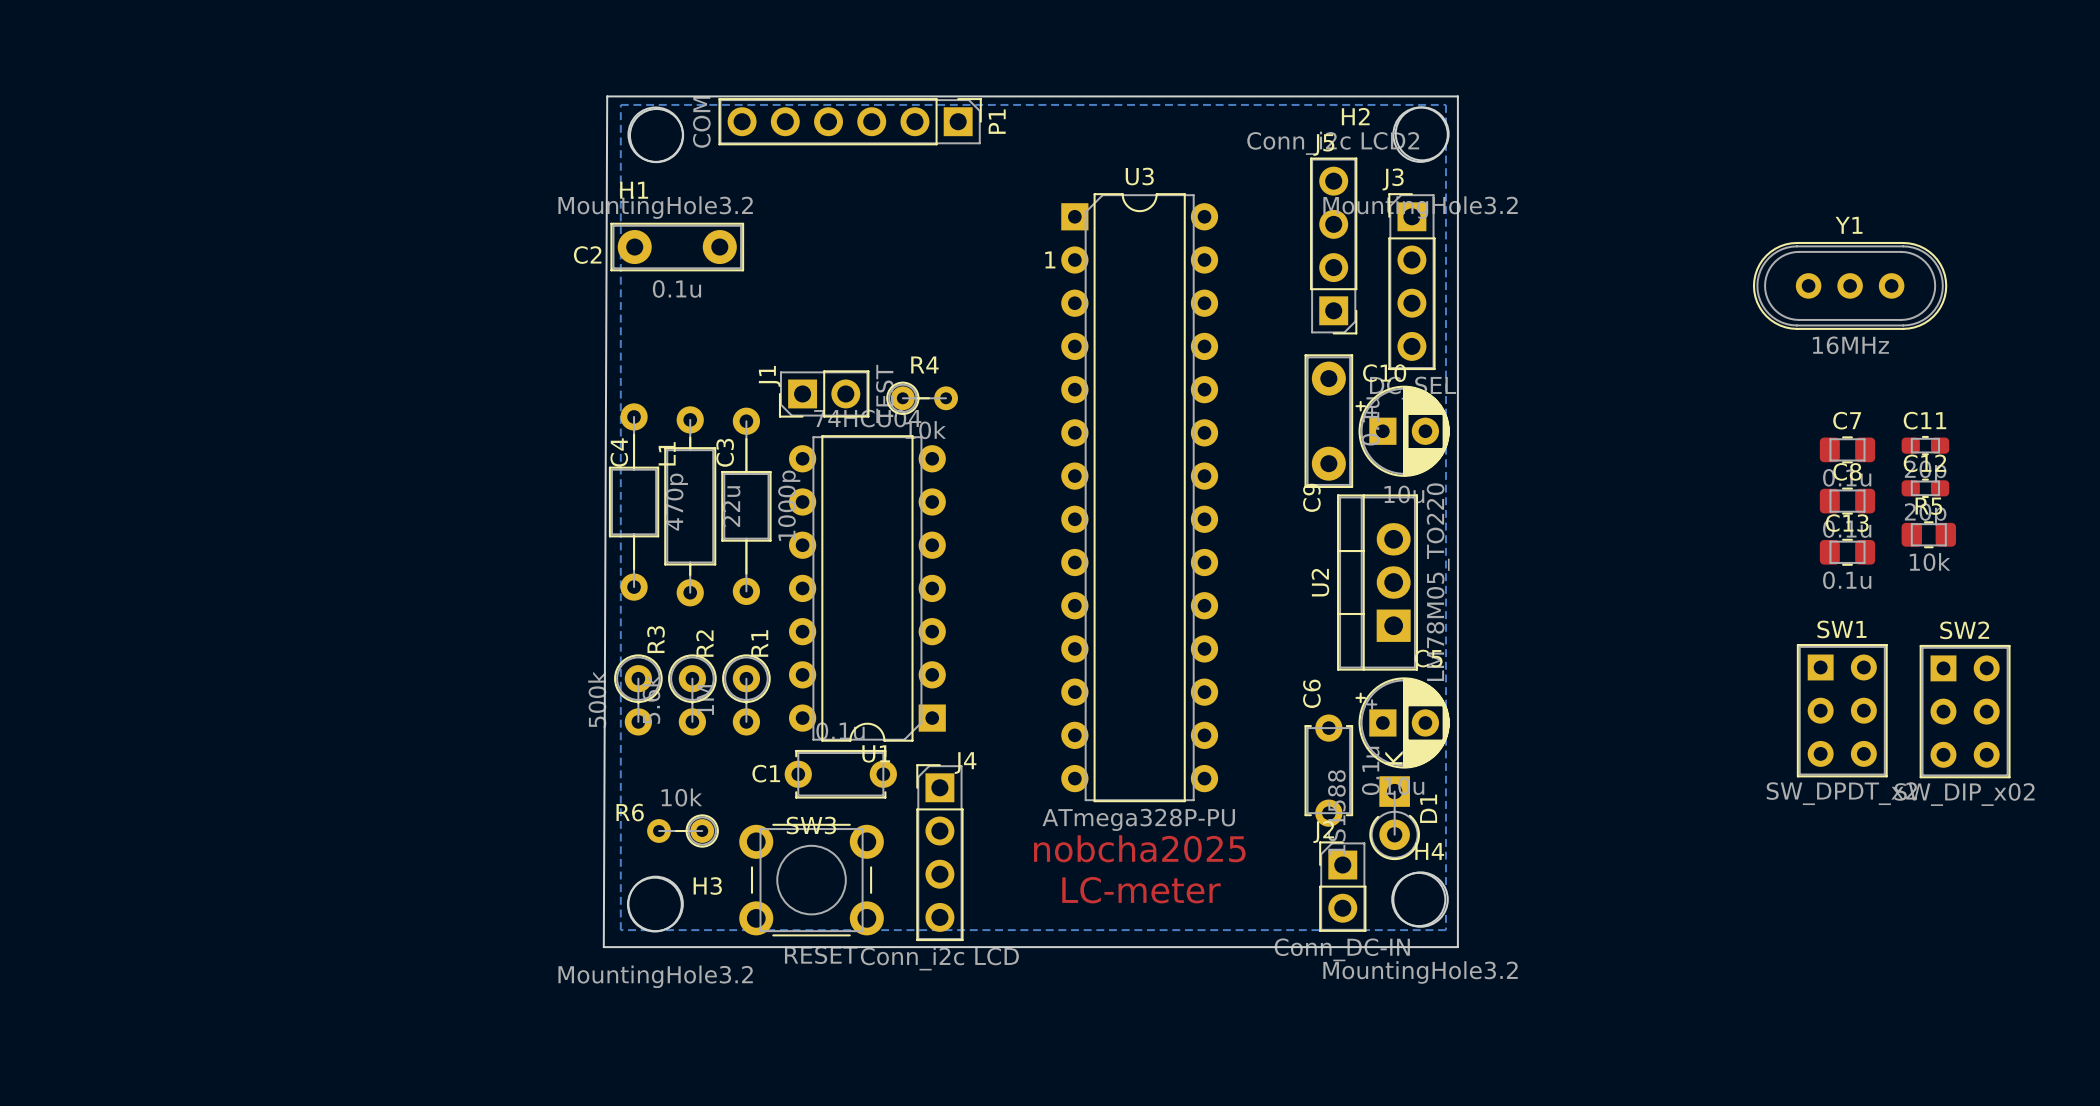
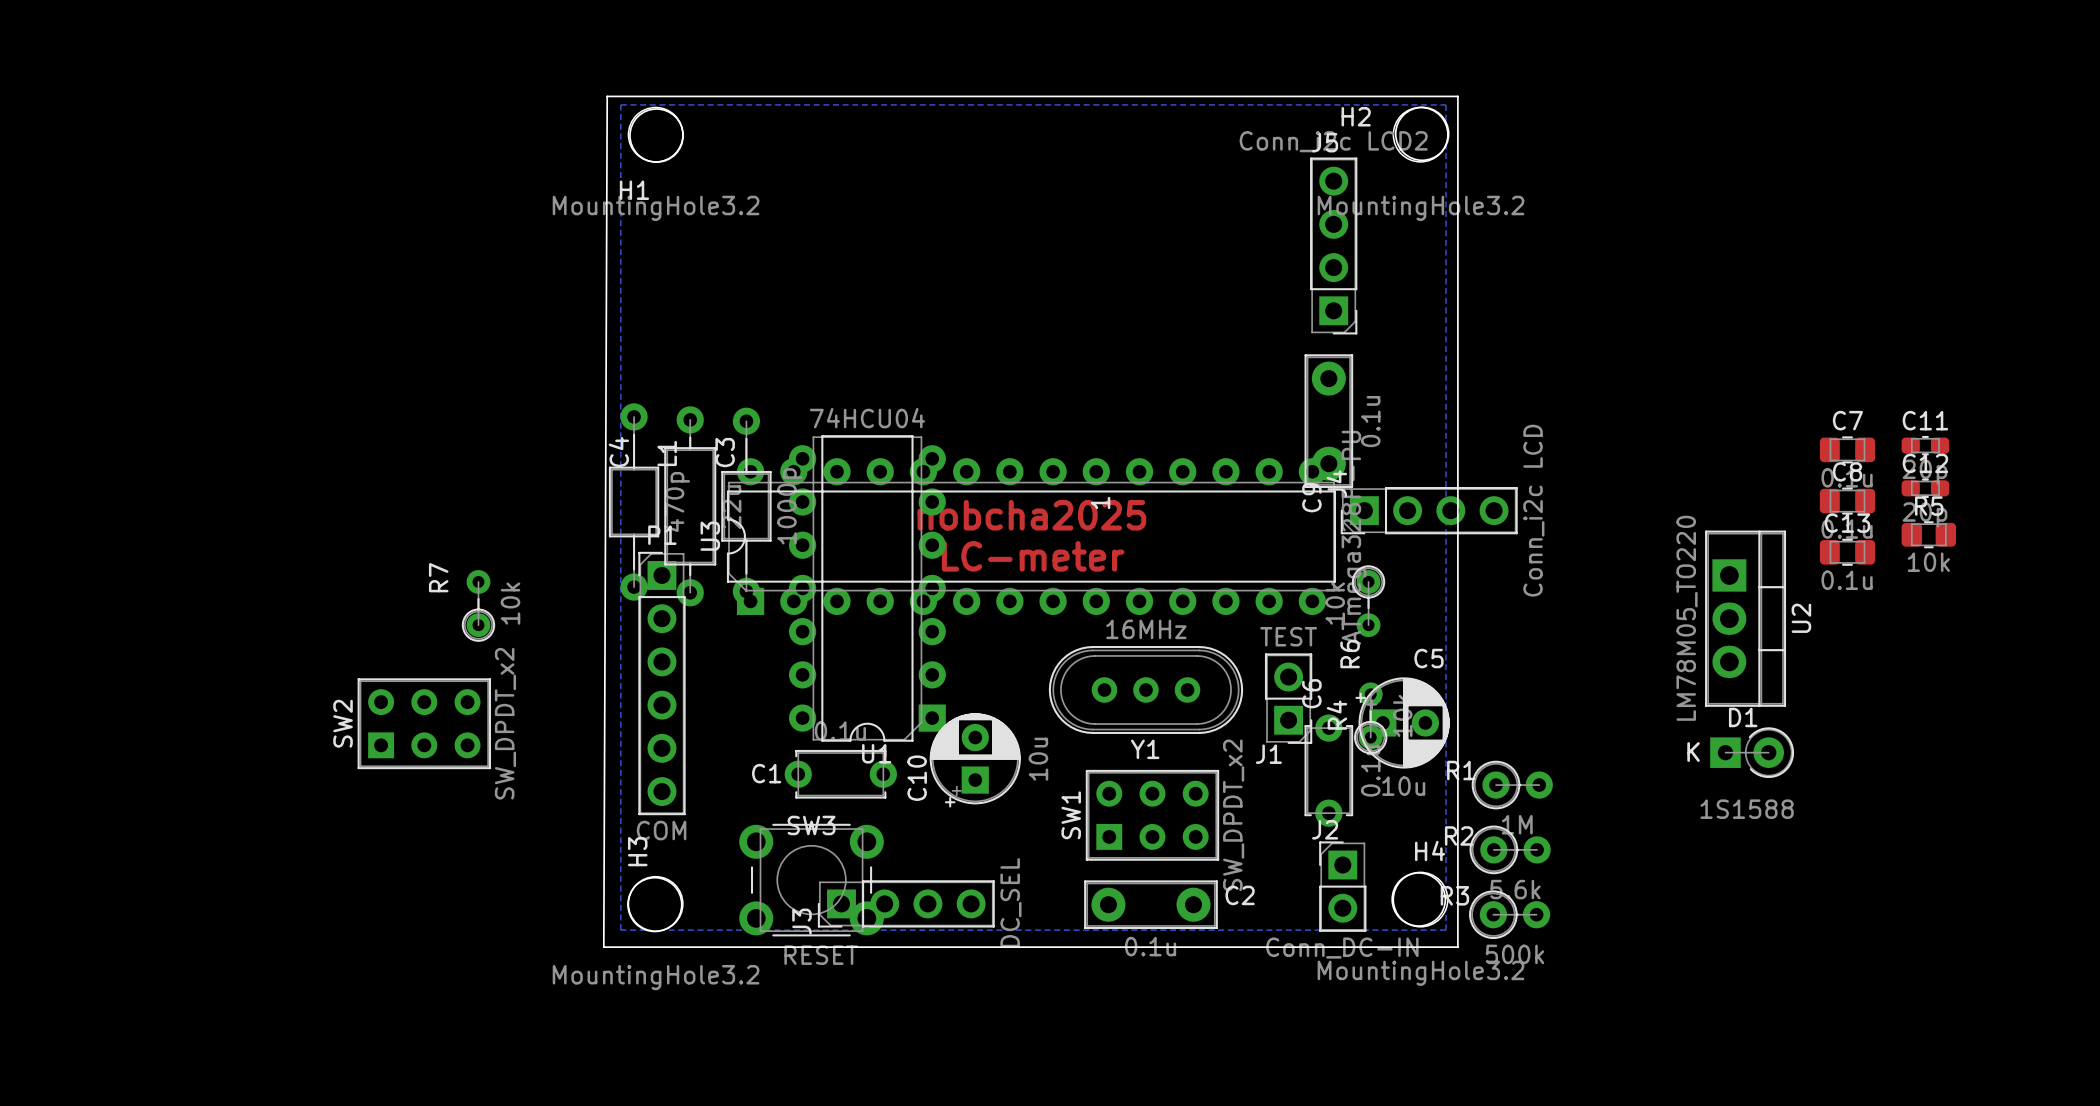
P1 rotation: 0° (850, 121) -> 90° counterclockwise (661, 683)
P1 position: (850, 121) -> (661, 683)
Y1 name position: Y1 (1849, 225) -> Y1 (1145, 749)
C2 position: (677, 247) -> (1150, 904)
C2 name position: C2 (587, 255) -> C2 (1240, 895)
text rotation: 0° (1050, 259) -> 90° counterclockwise (1100, 502)
text position: 1 (1050, 259) -> 1 (1100, 502)
J3 rotation: 0° (1411, 281) -> 90° counterclockwise (906, 903)
J3 position: (1411, 281) -> (906, 903)
Y1 position: (1850, 285) -> (1145, 689)
Y1 value position: 16MHz (1850, 345) -> 16MHz (1146, 629)
J1 rotation: 0° (824, 393) -> 90° counterclockwise (1288, 698)
J1 position: (824, 393) -> (1288, 698)
R4 rotation: 0° (922, 398) -> 90° counterclockwise (1370, 718)
R4 position: (922, 398) -> (1370, 718)
C10 rotation: 0° (1402, 431) -> 90° counterclockwise (975, 760)
C10 position: (1402, 431) -> (975, 760)
U3 rotation: 0° (1139, 497) -> 90° counterclockwise (1031, 536)
U2 rotation: 0° (1377, 582) -> 180° (1745, 618)
U2 position: (1377, 582) -> (1745, 618)
R7: none -> 10k (478, 605)
R3 rotation: 0° (638, 694) -> 90° counterclockwise (1509, 914)
R3 position: (638, 694) -> (1509, 914)
R2 rotation: 0° (692, 694) -> 90° counterclockwise (1510, 849)
R2 position: (692, 694) -> (1510, 849)
R1 rotation: 0° (746, 694) -> 90° counterclockwise (1512, 785)
R1 position: (746, 694) -> (1512, 785)
SW1 rotation: 0° (1842, 710) -> 90° counterclockwise (1152, 815)
SW1 position: (1842, 710) -> (1152, 815)
SW2 rotation: 0° (1965, 711) -> 90° counterclockwise (424, 723)
SW2 position: (1965, 711) -> (424, 723)
SW2 value: SW_DIP_x02 (1964, 794) -> SW_DPDT_x2 (505, 723)
D1 rotation: 0° (1394, 818) -> 90° counterclockwise (1752, 752)
D1 position: (1394, 818) -> (1752, 752)
R6 rotation: 0° (683, 831) -> 90° counterclockwise (1368, 601)
R6 position: (683, 831) -> (1368, 601)
text position: nobcha2025 (1139, 848) -> nobcha2025 (1031, 515)
J4 rotation: 0° (939, 852) -> 90° counterclockwise (1429, 510)
J4 position: (939, 852) -> (1429, 510)
H3 name rotation: 0° (707, 886) -> 90° counterclockwise (637, 851)
H3 name position: H3 (707, 886) -> H3 (637, 851)
text position: LC-meter (1141, 890) -> LC-meter (1033, 556)

